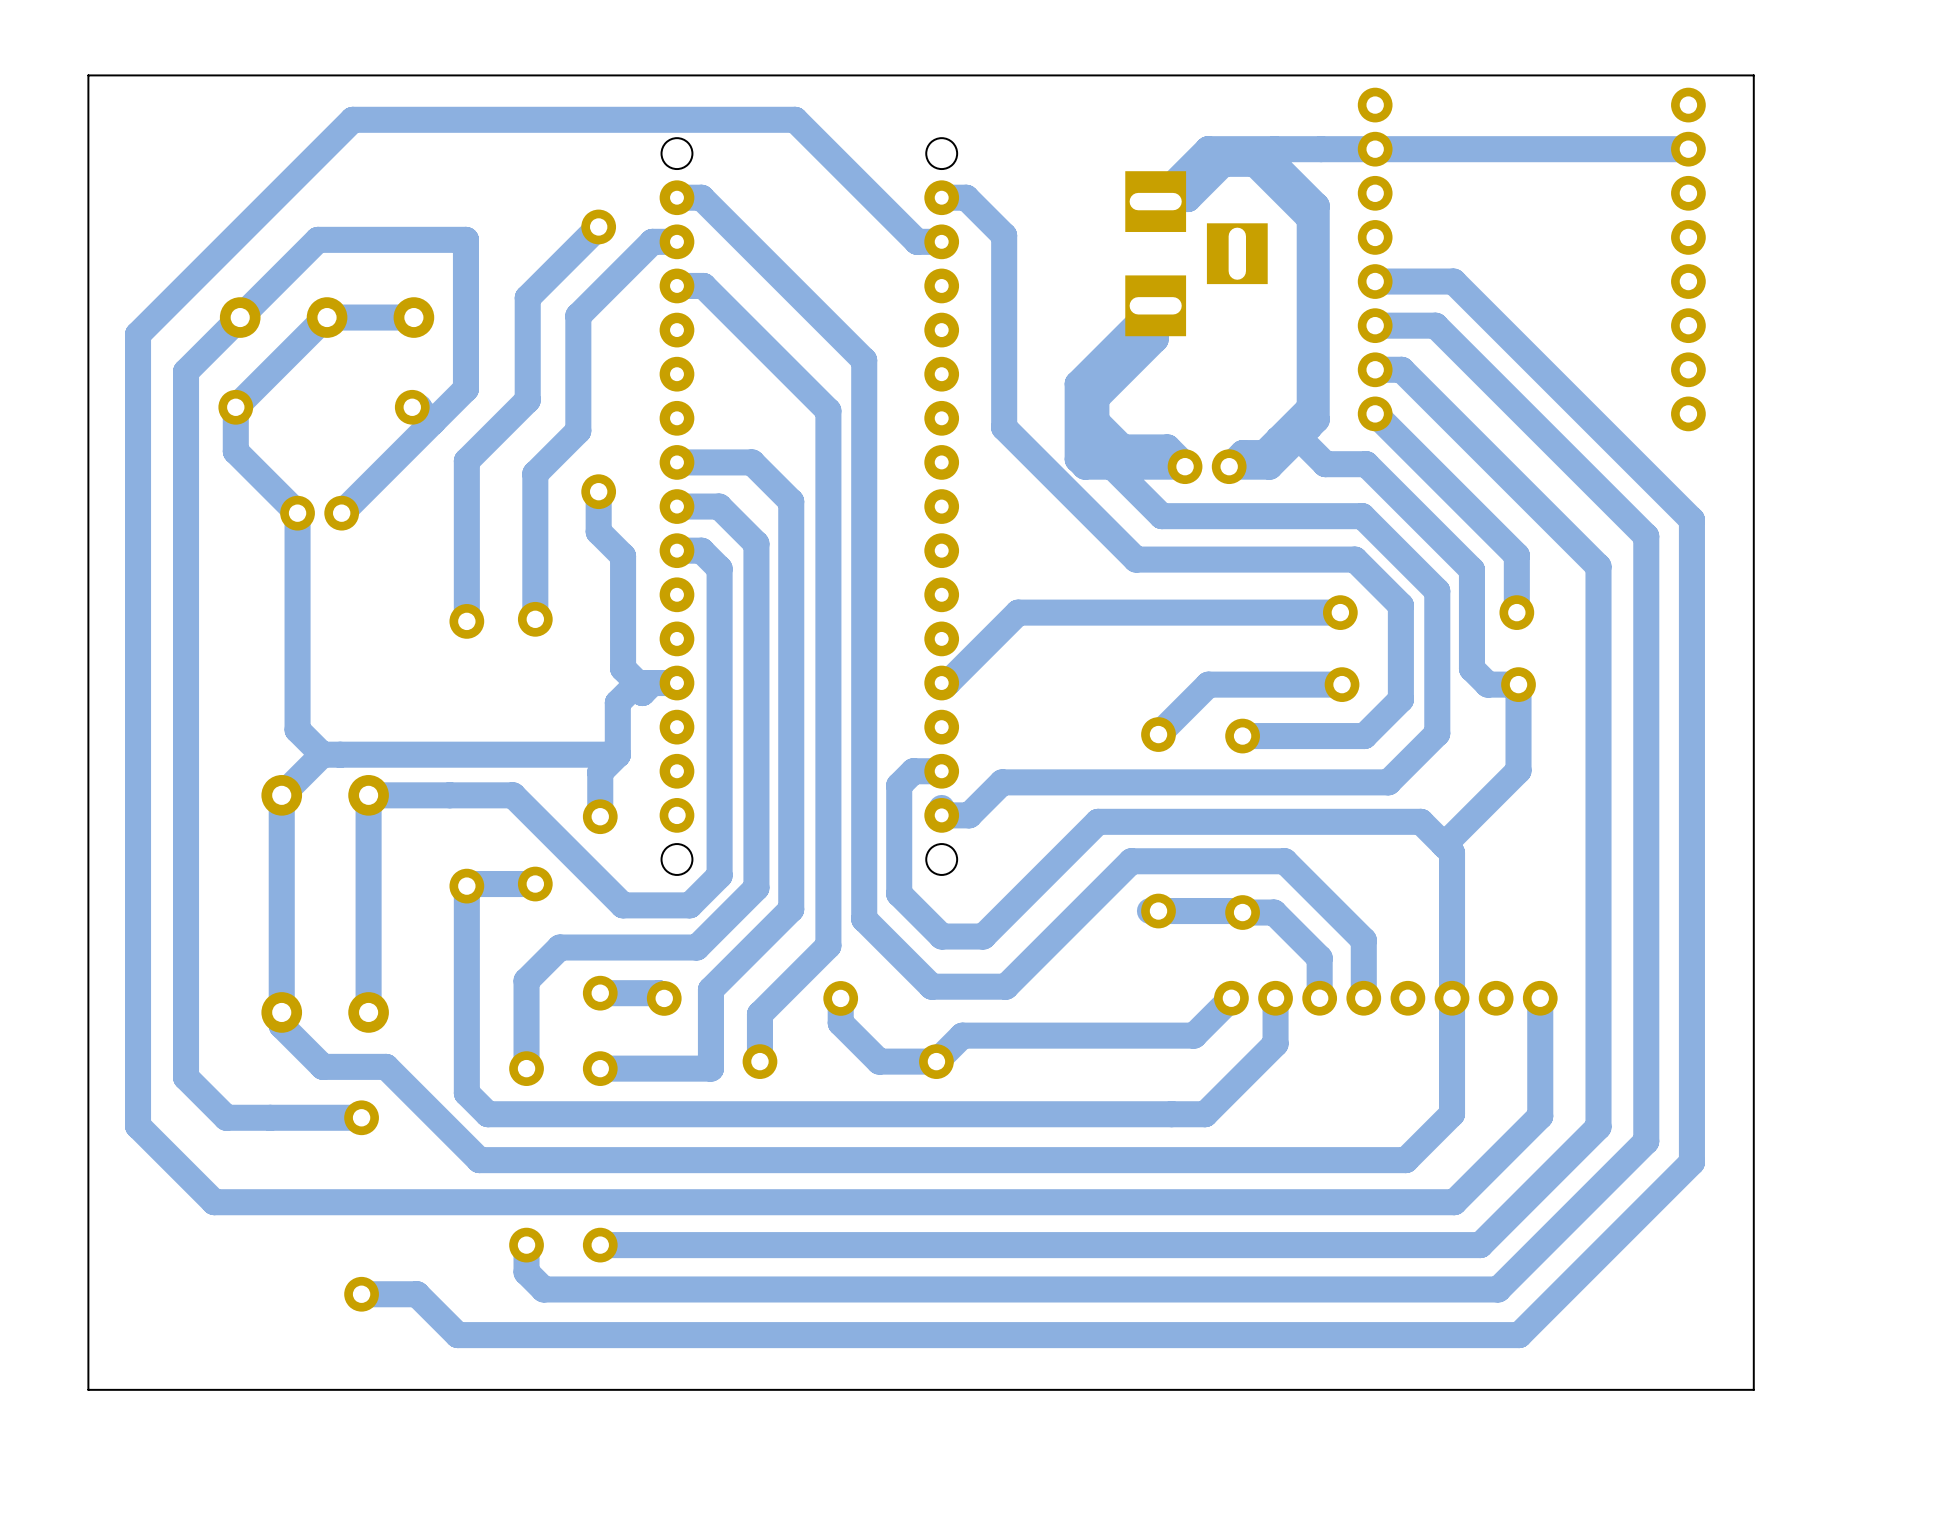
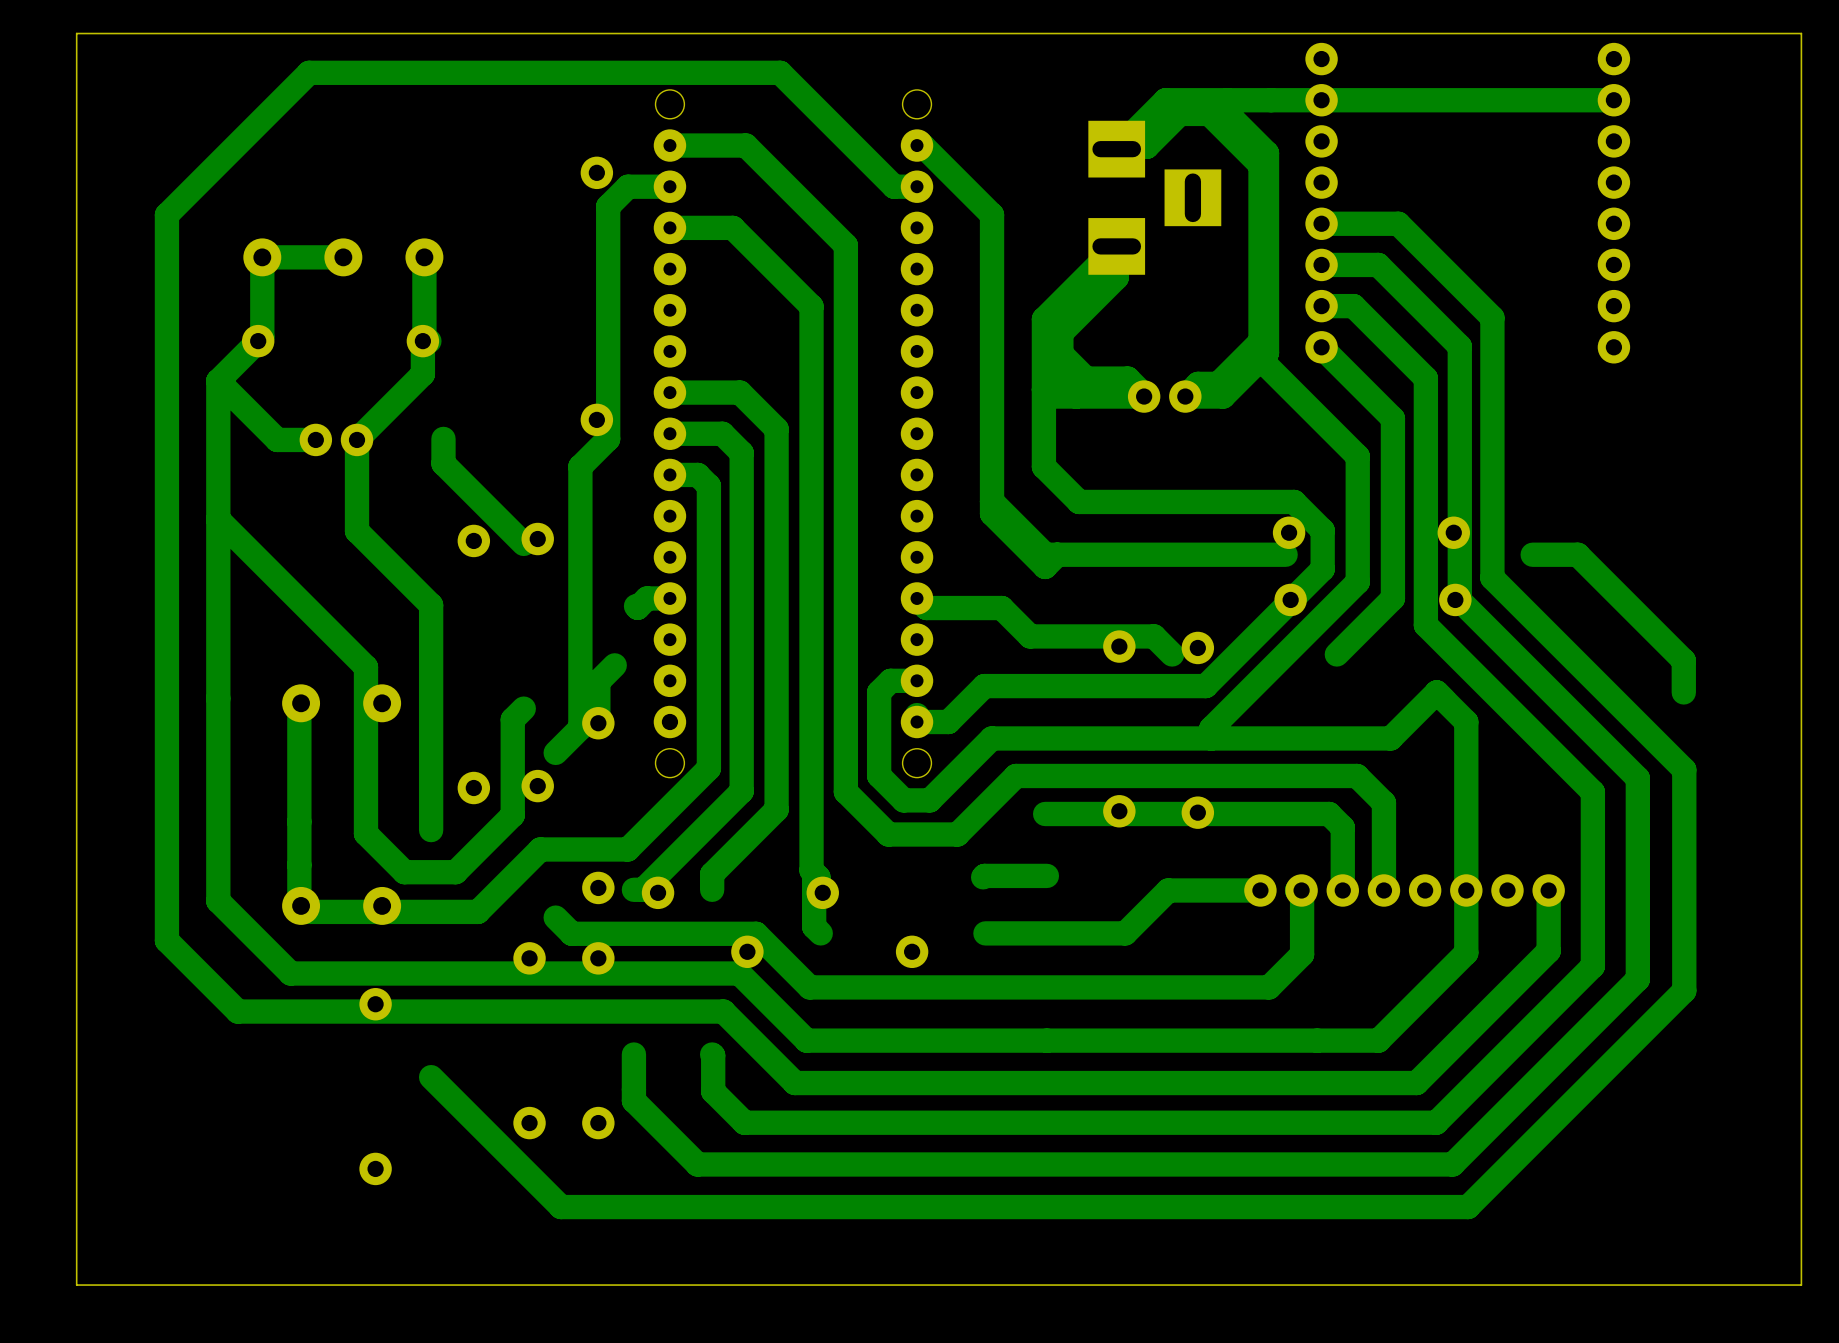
board edge: (1753, 75) (88, 75) (88, 1389) (1753, 1389) (1753, 75) -> (1801, 33) (1801, 1285) (76, 1285) (76, 33) (1801, 33)
bottom track: (352, 119) (138, 334) -> (367, 72) (309, 72) (166, 214) (166, 273)
bottom track: (701, 197) (864, 360) (864, 919) (931, 986) (1005, 986) (1131, 861) (1284, 861) (1363, 940) (1363, 998) -> (692, 145) (745, 145) (845, 245) (845, 791) (888, 834) (957, 834) (1015, 775) (1356, 775) (1383, 802) (1383, 890)
bottom track: (947, 197) (966, 197) (1004, 235) (1004, 427) (1136, 559) (1354, 559) (1400, 605) (1400, 699) (1364, 736) (1242, 736) -> (922, 145) (992, 214) (992, 513) (1045, 566) (1057, 554)
bottom track: (598, 226) (527, 297) (527, 400) (466, 461) (466, 621) -> none
bottom track: (652, 241) (578, 315) (578, 430) (535, 473) (535, 619) -> (647, 186) (628, 186) (608, 206) (608, 438) (580, 466) (580, 728) (555, 752)
bottom track: (1453, 281) (1691, 519) (1691, 1162) (1519, 1335) -> (1394, 223) (1398, 223) (1492, 317) (1492, 577) (1684, 769) (1684, 990) (1468, 1207) (1456, 1207)
bottom track: (703, 285) (828, 410) (828, 945) (759, 1014) (759, 1061) -> (694, 227) (732, 227) (811, 306) (811, 870) (818, 877) (814, 881) (814, 926) (820, 933)
bottom track: (325, 317) (240, 402) -> (341, 257) (262, 257) (262, 337)
bottom track: (413, 317) (327, 317) -> (424, 257) (422, 374)
bottom track: (1435, 325) (1646, 536) (1646, 1141) (1498, 1289) -> (1377, 264) (1459, 346) (1459, 600) (1637, 778) (1637, 979) (1452, 1164) (1436, 1164)
bottom track: (1401, 369) (1598, 566) (1598, 1126) (1480, 1245) (600, 1245) -> (1346, 306) (1353, 306) (1425, 378) (1425, 625) (1592, 792) (1592, 966) (1436, 1122) (744, 1122) (713, 1091) (712, 1054)
bottom track: (235, 407) (235, 451) (297, 513) (297, 729) (322, 754) -> (258, 341) (218, 381)
bottom track: none -> (1260, 359) (1357, 456) (1357, 582) (1211, 728) (1211, 738)
bottom track: (1278, 439) (1300, 439) (1325, 464) (1366, 464) (1471, 569) (1471, 668) (1487, 684) (1518, 684) (1518, 770) (1444, 845) -> none
bottom track: (412, 442) (465, 388) (465, 239) (317, 239) (186, 371) (186, 1077) (226, 1117) (361, 1117) -> none
bottom track: none -> (218, 381) (277, 439) (315, 439)
bottom track: (1112, 466) (1161, 516) (1362, 516) (1437, 591) (1437, 733) (1388, 782) (1002, 782) (969, 815) -> (1043, 389) (1043, 466) (1079, 501) (1294, 501) (1322, 530) (1322, 569) (1205, 686) (984, 686) (948, 722) (942, 722)
bottom track: (1451, 490) (1516, 555) (1516, 612) -> (1392, 418) (1392, 598) (1336, 654)
bottom track: (598, 491) (598, 531) (623, 556) (623, 668) (637, 683) -> none
bottom track: (719, 506) (756, 543) (756, 887) (696, 947) (559, 947) (526, 980) (526, 1068) -> (709, 433) (722, 433) (741, 452) (741, 791) (643, 889) (633, 889)
bottom track: none -> (443, 438) (443, 463) (523, 543)
bottom track: none -> (357, 439) (357, 531) (431, 605) (431, 830)
bottom track: (701, 550) (719, 568) (719, 875) (689, 905) (623, 905) (512, 795) (368, 795) (368, 1012) -> (692, 474) (697, 474) (708, 485) (708, 768) (627, 849) (540, 849) (477, 911) (310, 911) (299, 901) (299, 698)
bottom track: none -> (992, 501) (1045, 554) (1285, 554)
bottom track: none -> (218, 519) (365, 667) (365, 833) (404, 872) (455, 872) (512, 815) (512, 719) (523, 708)
bottom track: (1340, 612) (1018, 612) (947, 683) (941, 683) -> (1172, 654) (1154, 636) (1030, 636) (1001, 608) (926, 608) (917, 598)
bottom track: none -> (1532, 554) (1577, 554) (1683, 660) (1683, 692)
bottom track: (637, 683) (617, 702) (617, 754) (322, 754) -> none
bottom track: (1342, 684) (1208, 684) (1158, 734) -> none
bottom track: (322, 754) (281, 795) (281, 1025) (322, 1066) (386, 1066) (479, 1160) (1405, 1160) (1452, 1113) (1452, 852) (1420, 821) (1097, 821) (983, 936) (941, 936) (899, 893) (899, 785) (901, 783) -> (218, 381) (218, 901) (290, 973) (739, 973) (806, 1040) (1378, 1040) (1466, 952) (1466, 722) (1436, 692) (1390, 738) (991, 738) (929, 800) (903, 800) (879, 775) (879, 692)
bottom track: (535, 884) (468, 884) (466, 886) (466, 1093) (487, 1114) (1205, 1114) (1275, 1043) (1275, 998) -> none
bottom track: (1149, 911) (1274, 912) (1319, 958) (1319, 998) -> none
bottom track: none -> (1045, 813) (1329, 813) (1342, 827) (1342, 890)
bottom track: (722, 978) (710, 989) (710, 1068) (600, 1068) -> (712, 874) (712, 889)
bottom track: none -> (1046, 875) (983, 877)
bottom track: (600, 993) (658, 993) (664, 998) -> none
bottom track: none -> (1260, 890) (1168, 890) (1125, 933) (985, 933)
bottom track: none -> (1301, 890) (1297, 890) (1302, 895) (1302, 954) (1269, 987) (809, 987) (756, 933) (571, 933) (555, 917)
bottom track: (1231, 998) (1194, 1035) (962, 1035) (936, 1061) (879, 1061) (840, 1023) (840, 998) -> none
part position: (1385, 998) -> (1404, 890)
bottom track: (1540, 998) (1540, 1116) (1454, 1202) -> (1548, 890) (1548, 951) (1416, 1083) (1395, 1083)
bottom track: (138, 1049) (138, 1125) (214, 1202) (810, 1202) -> (166, 940) (237, 1011) (723, 1011) (794, 1083)
bottom track: (526, 1245) (526, 1272) (543, 1289) (706, 1289) -> (633, 1054) (633, 1100) (697, 1164)
bottom track: (361, 1294) (416, 1294) (457, 1335) (560, 1335) -> (431, 1077) (561, 1207)

